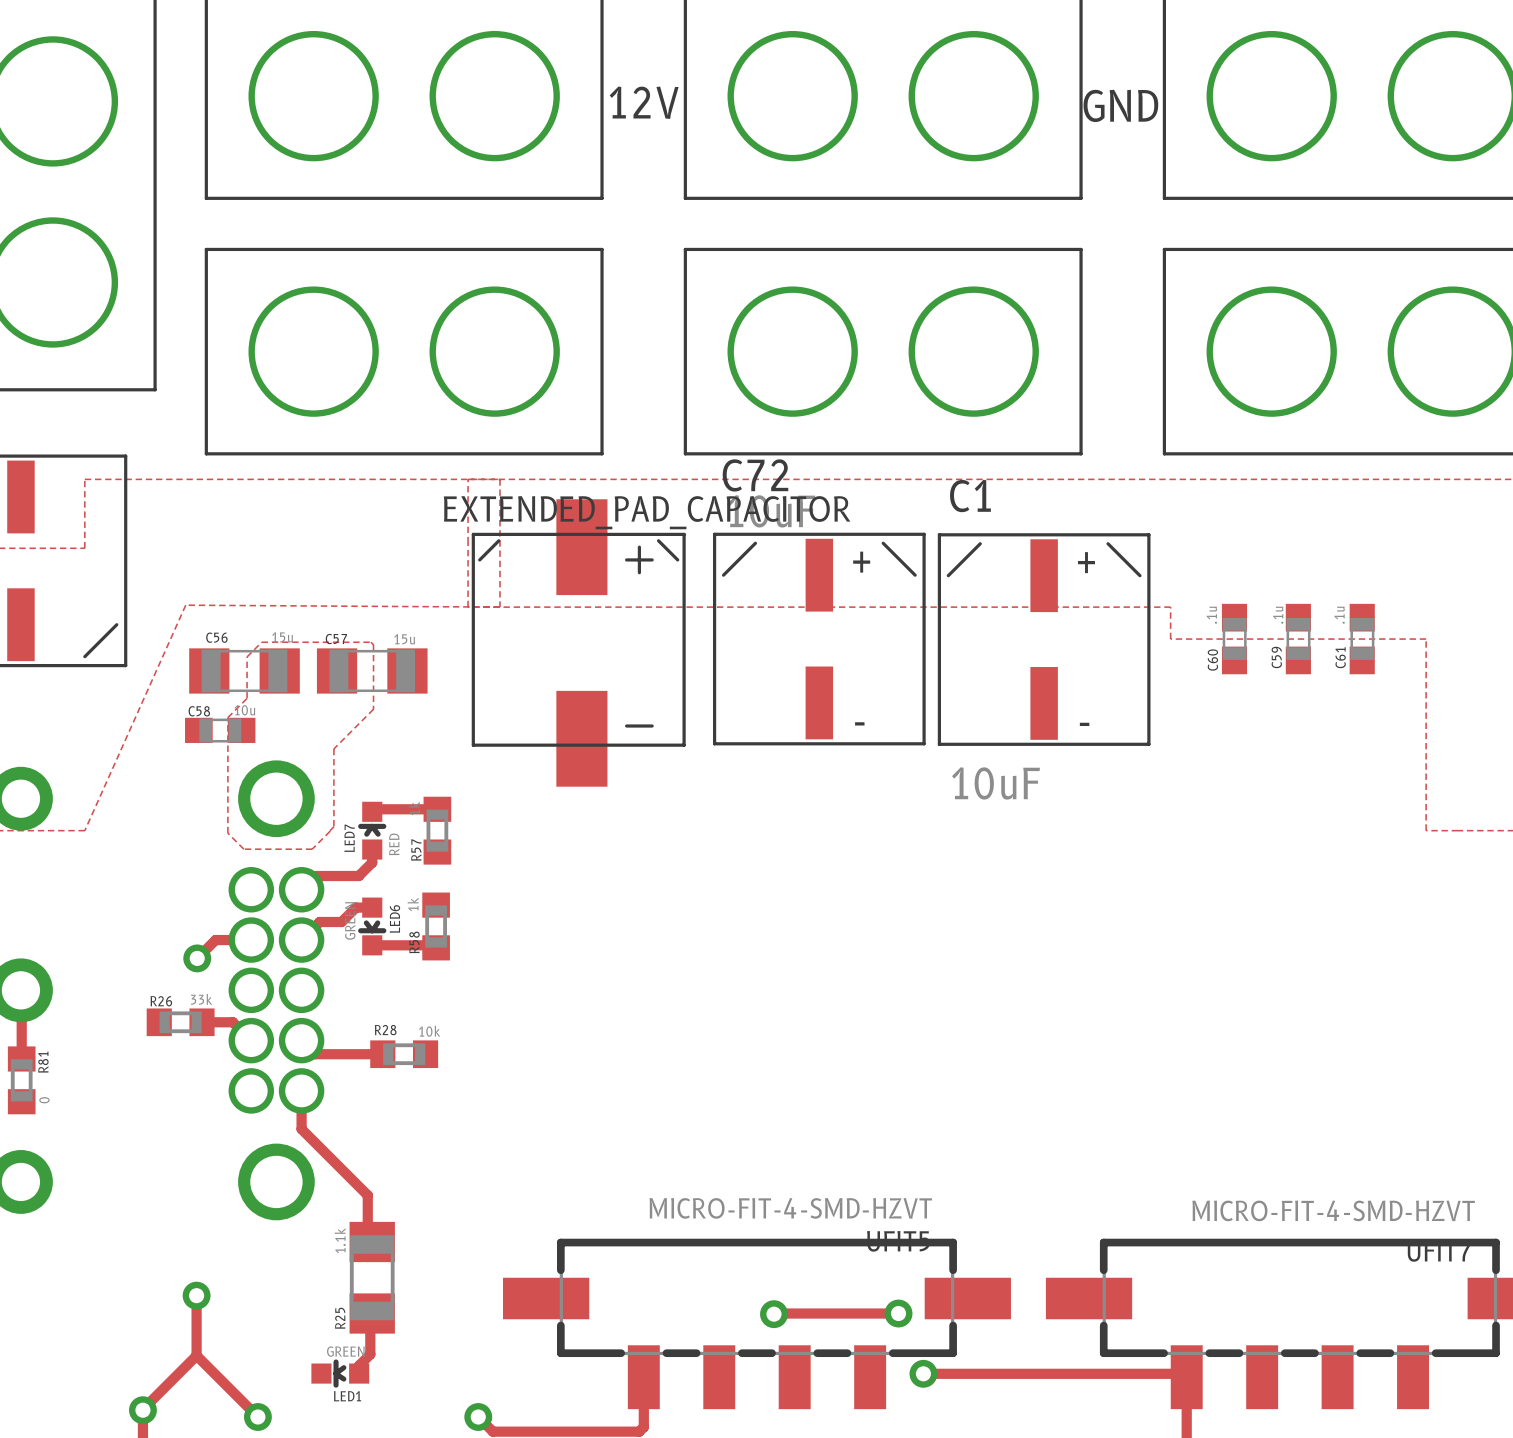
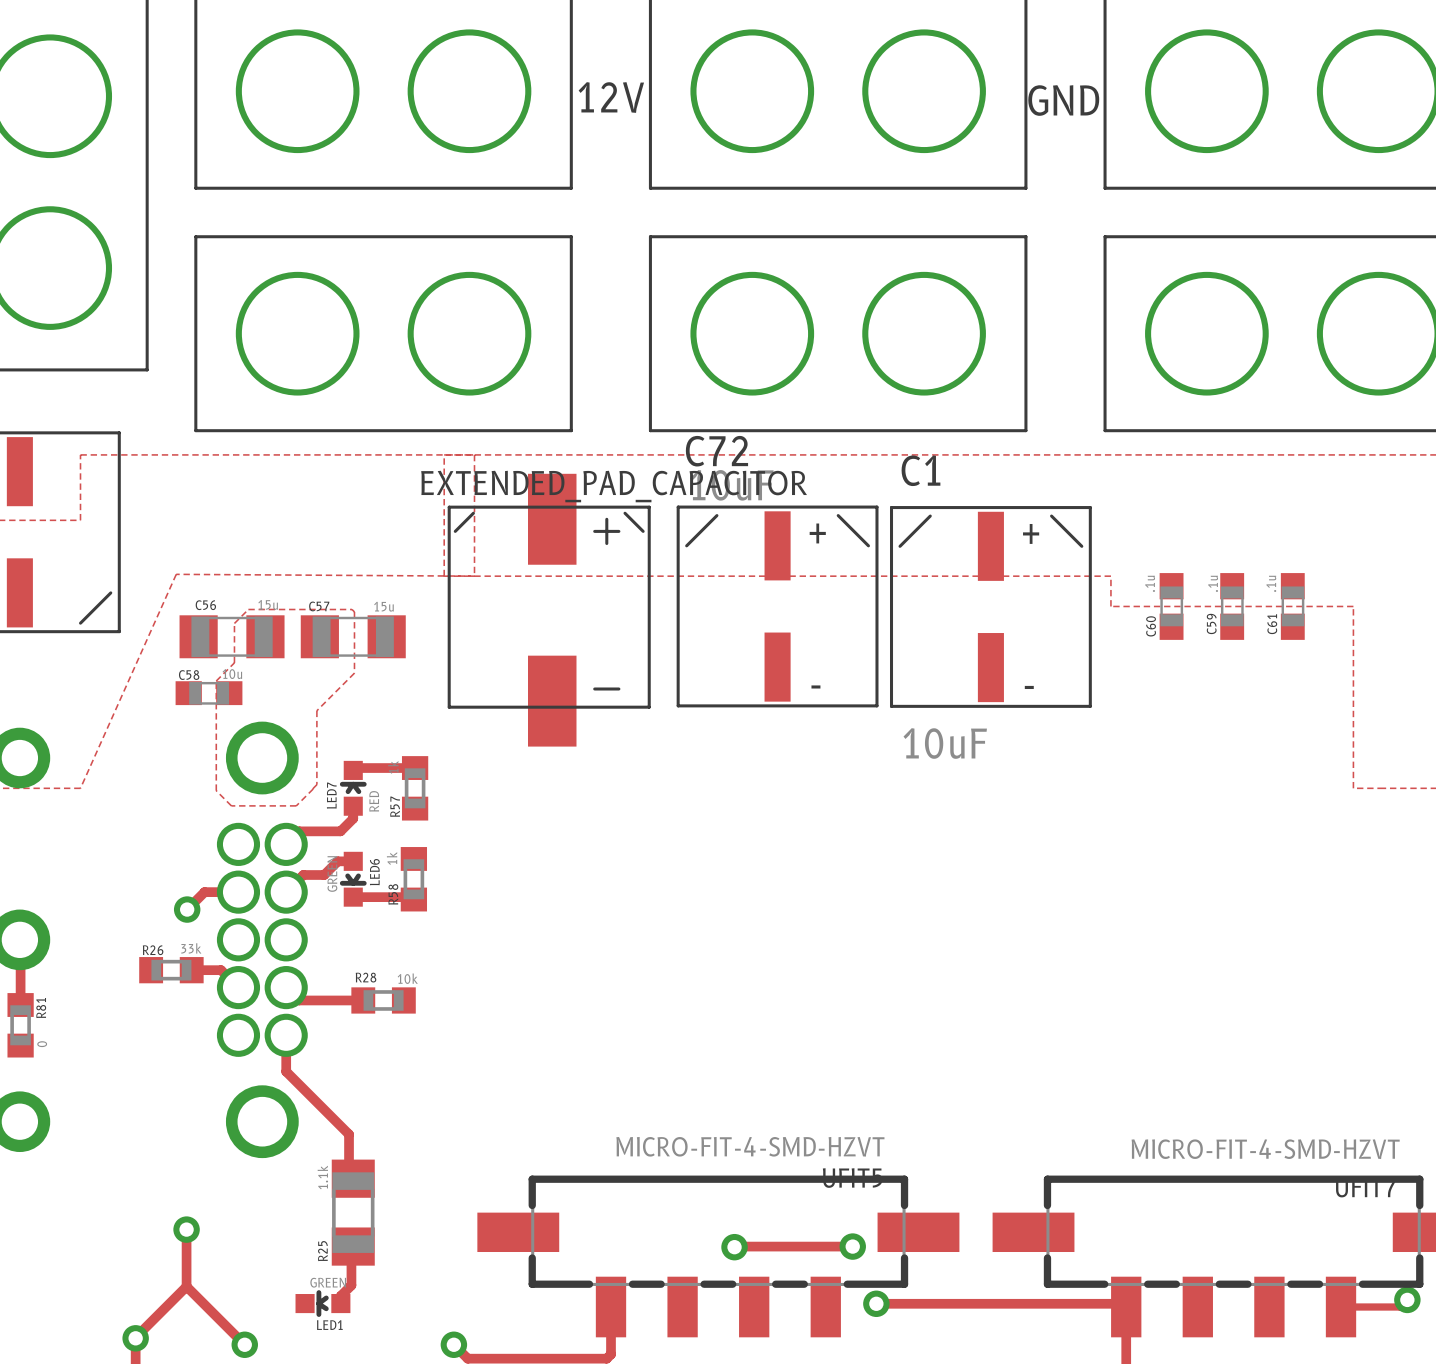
track: none -> (1407, 1299) (1400, 1307) (1341, 1307)
via: none -> (1407, 1299)

